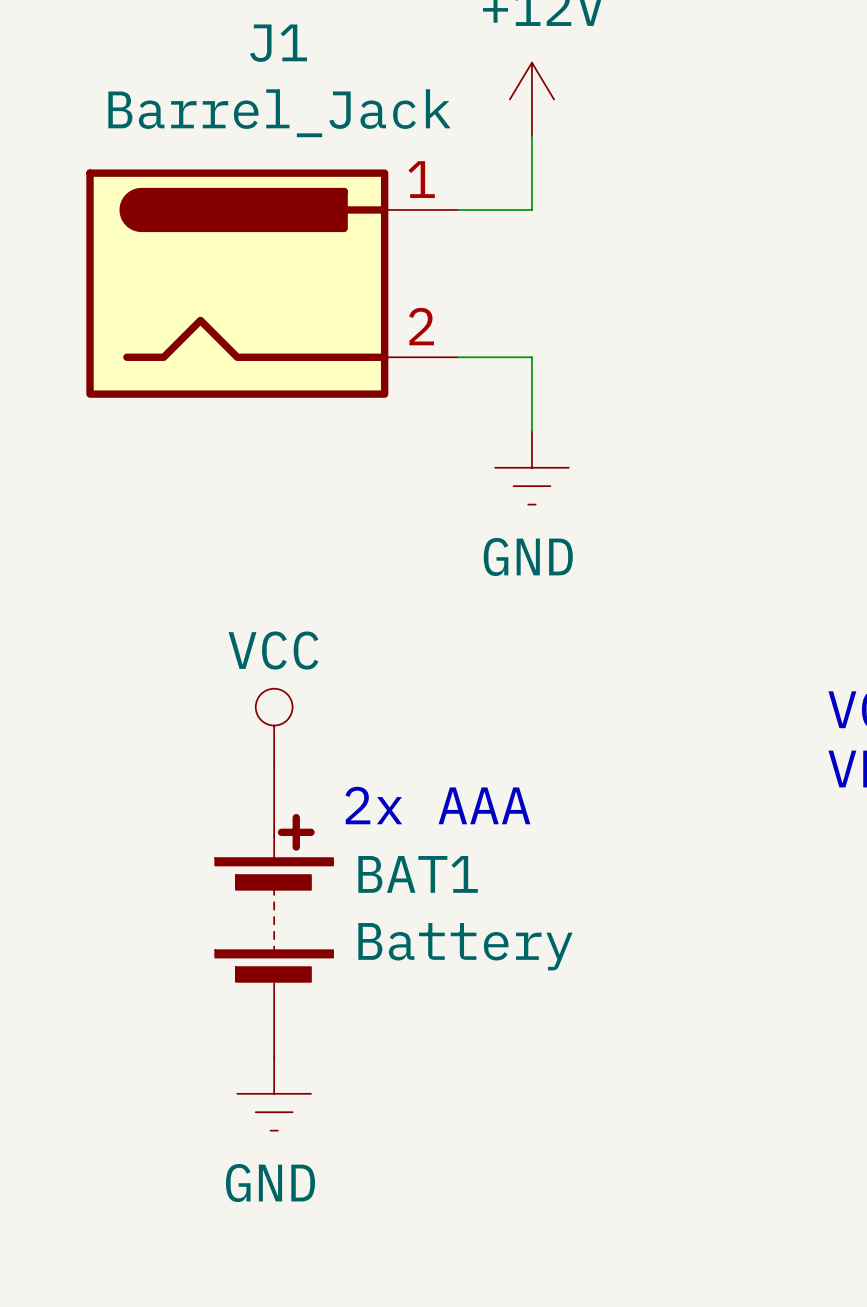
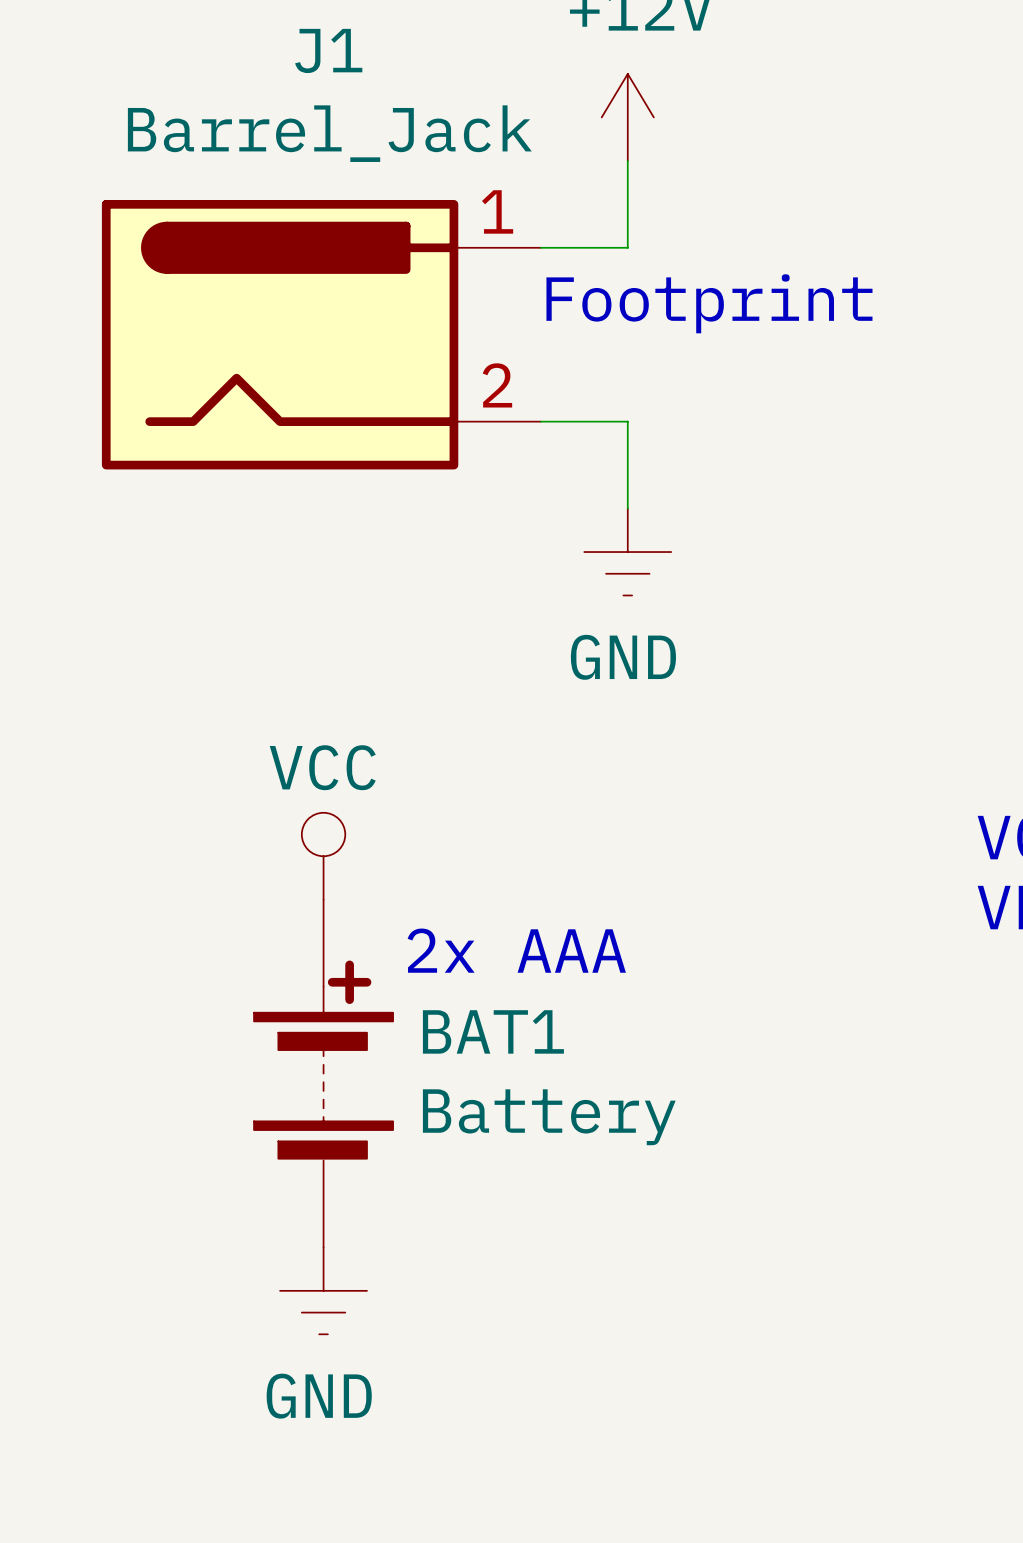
text: none -> Footprint (709, 303)

